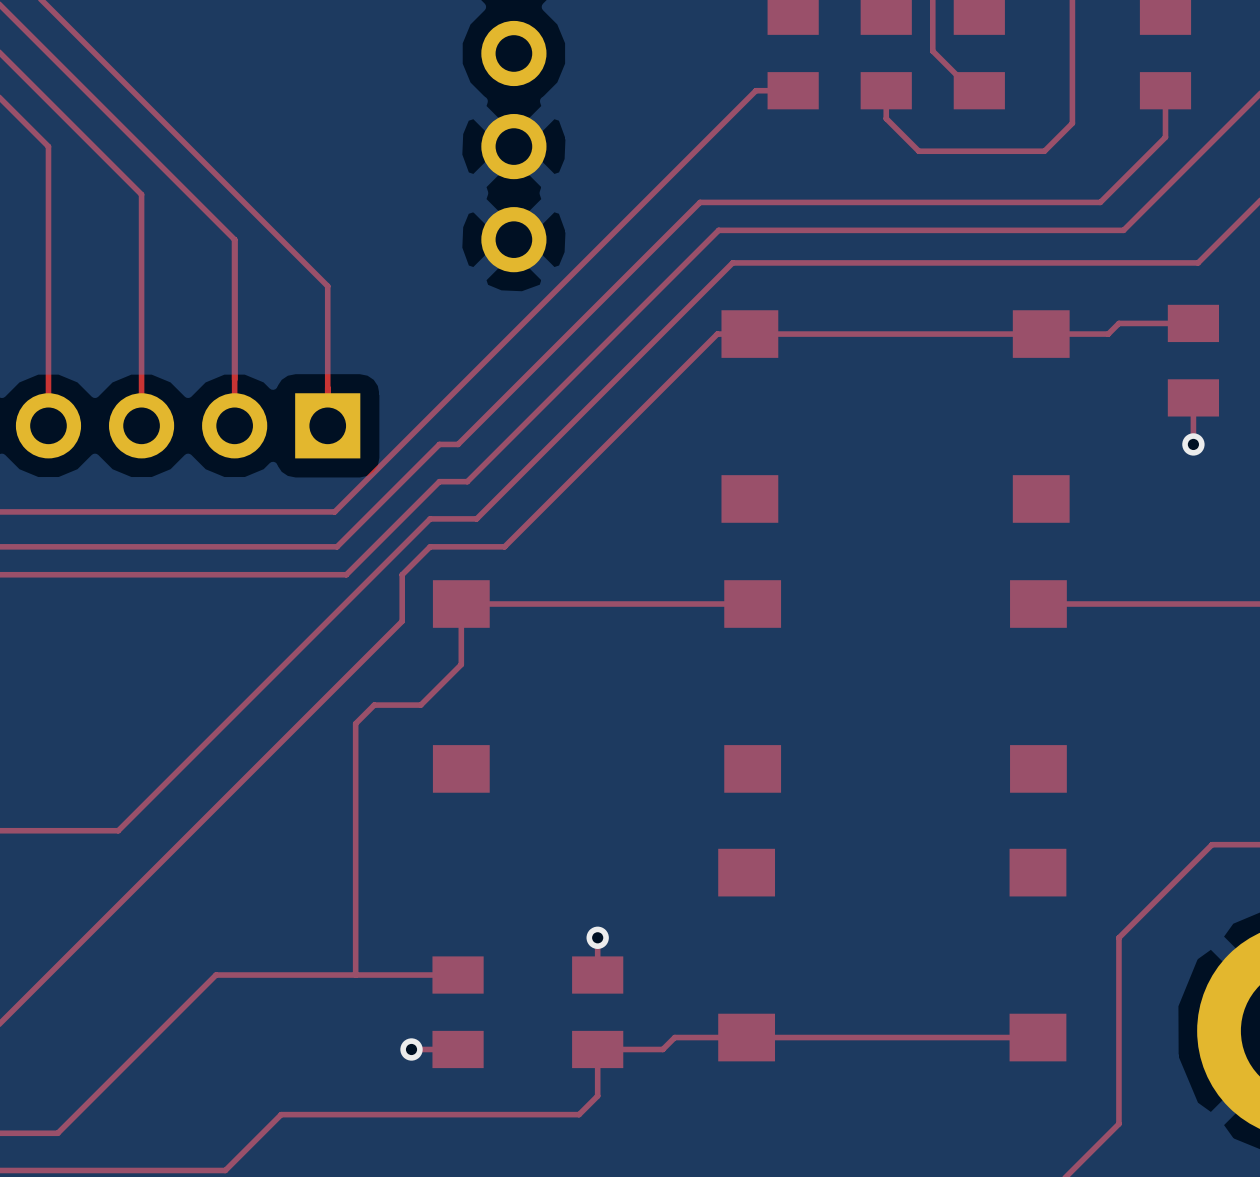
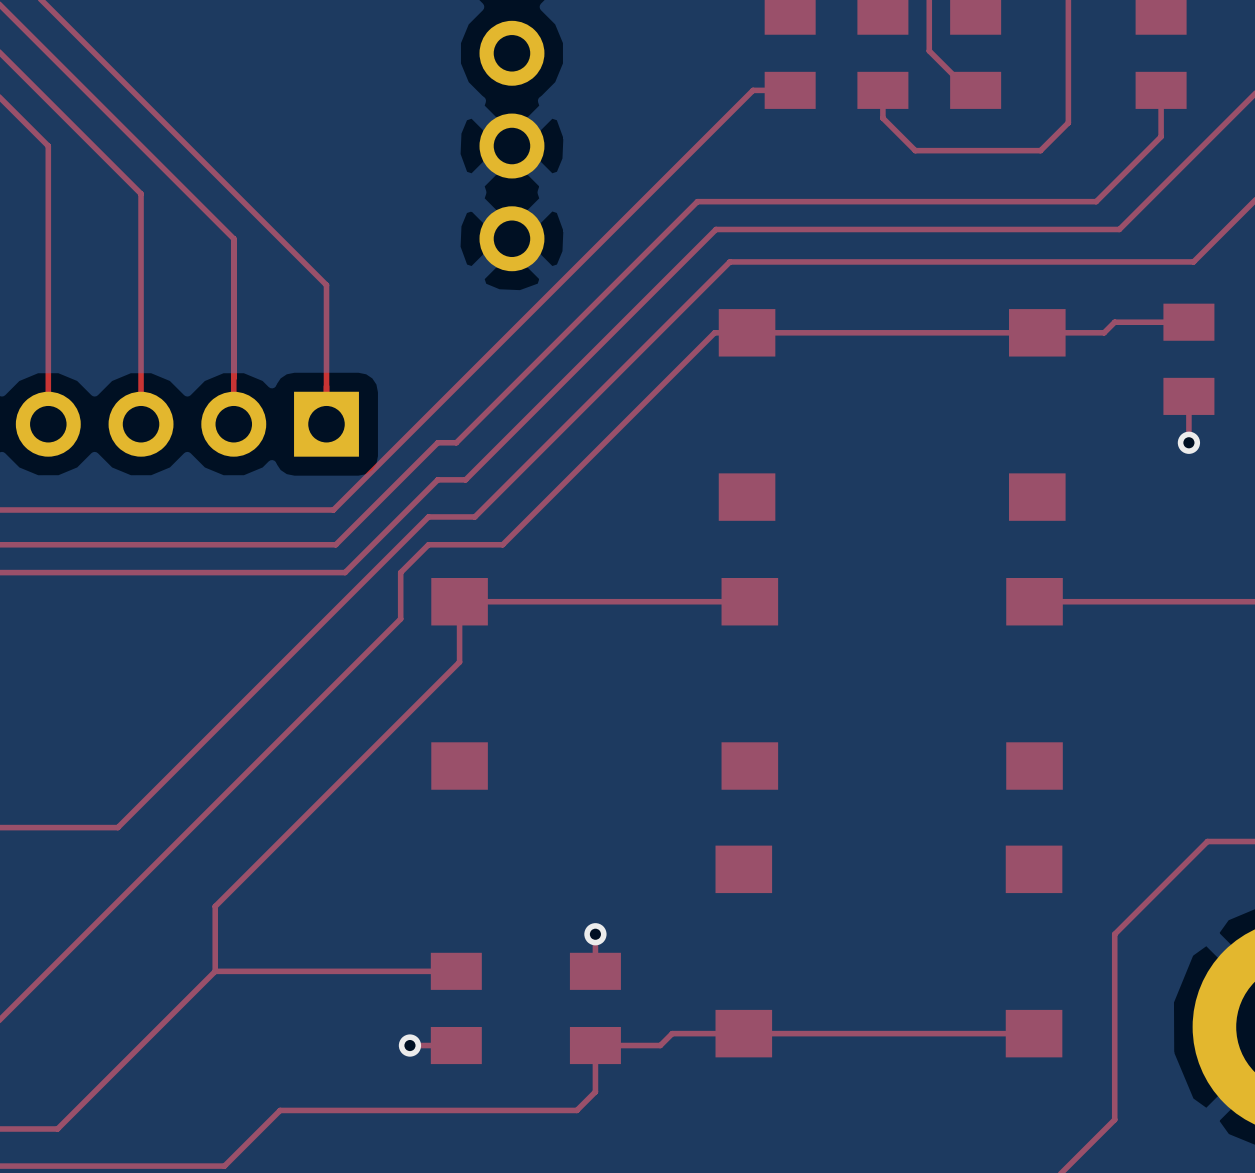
top track: (420, 705) (374, 705) (355, 723) (355, 975) -> (419, 702) (215, 906) (215, 971)

